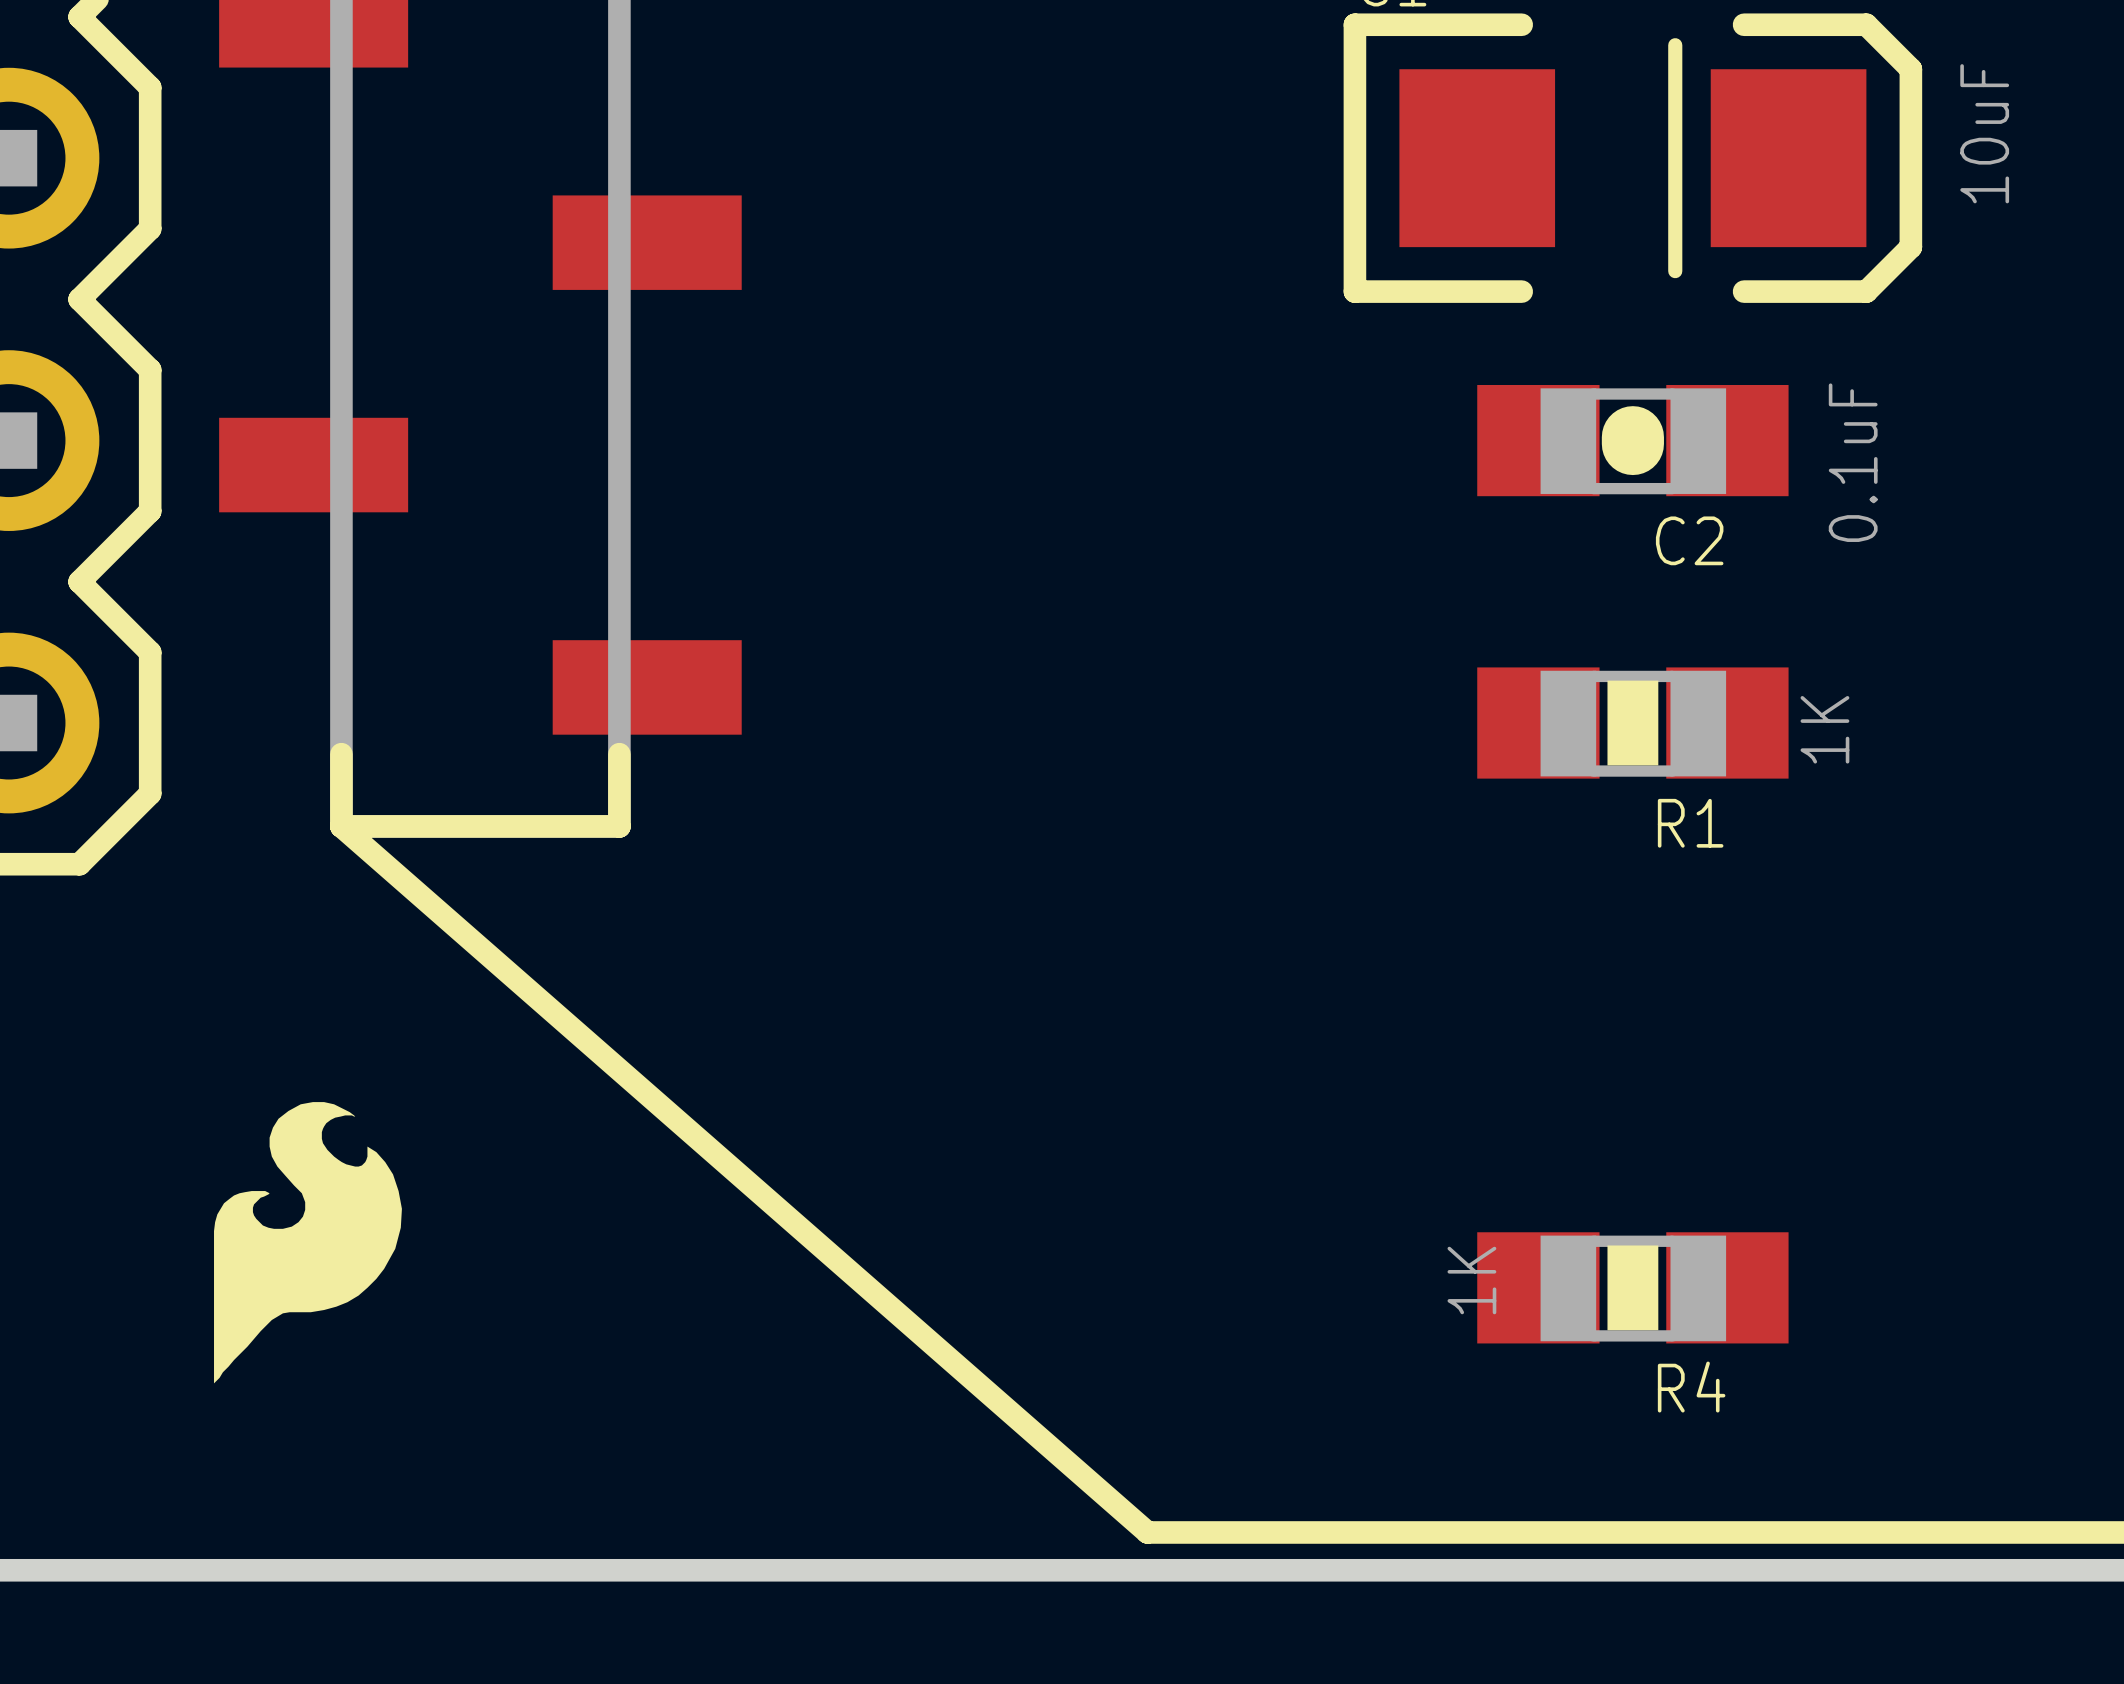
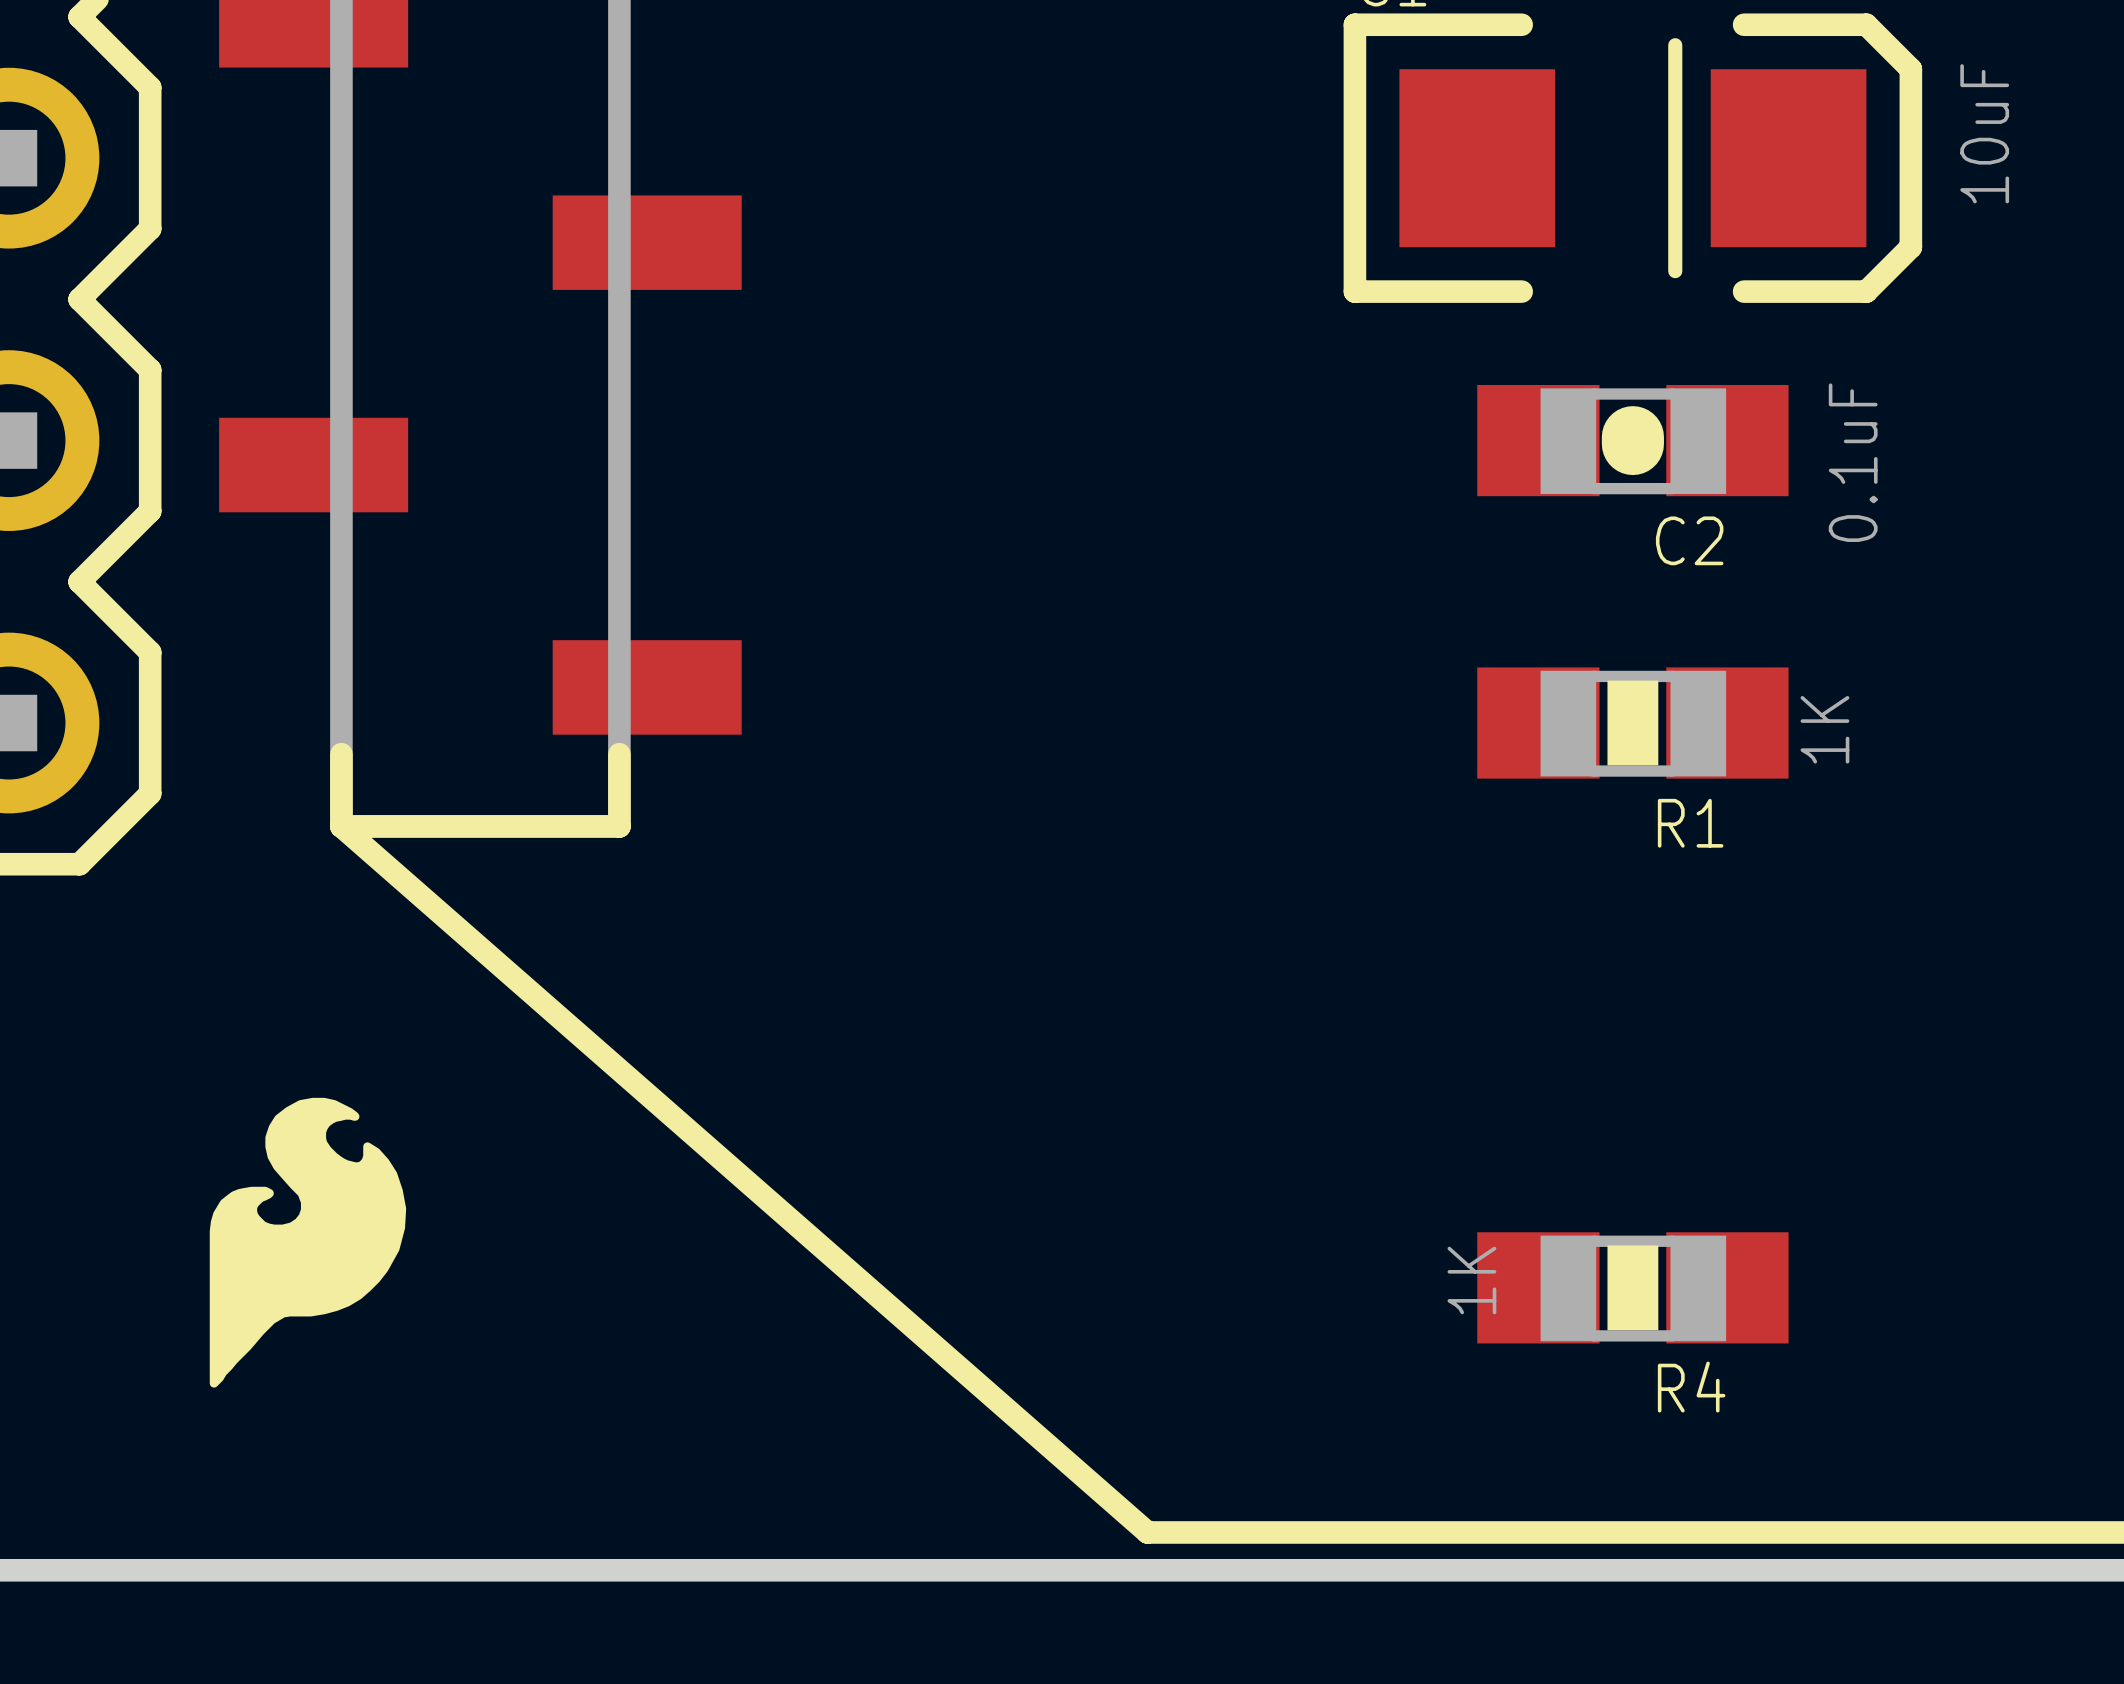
drawing shape: [214, 1102, 402, 1385] -> [209, 1097, 407, 1388]

